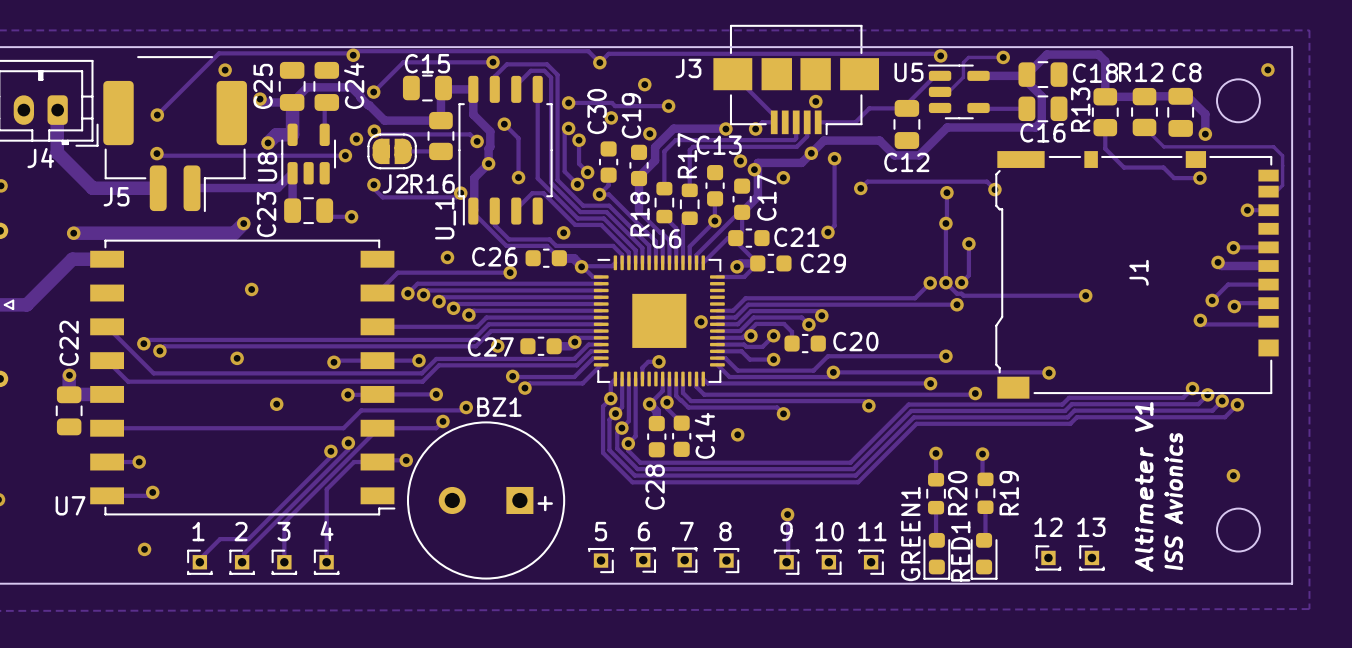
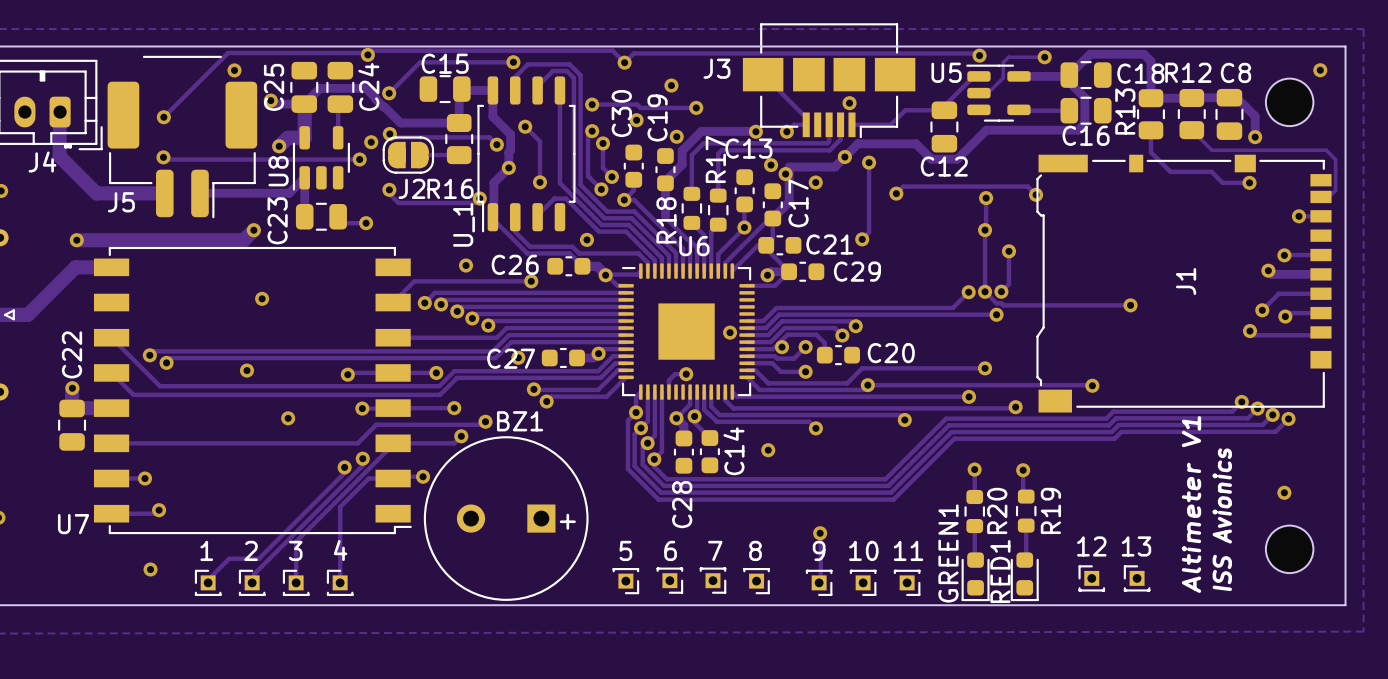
round board edge: [1216, 78, 1261, 124] -> none
part: none -> (1289, 102)
round board edge: [1216, 507, 1261, 553] -> none
part: none -> (1289, 549)

